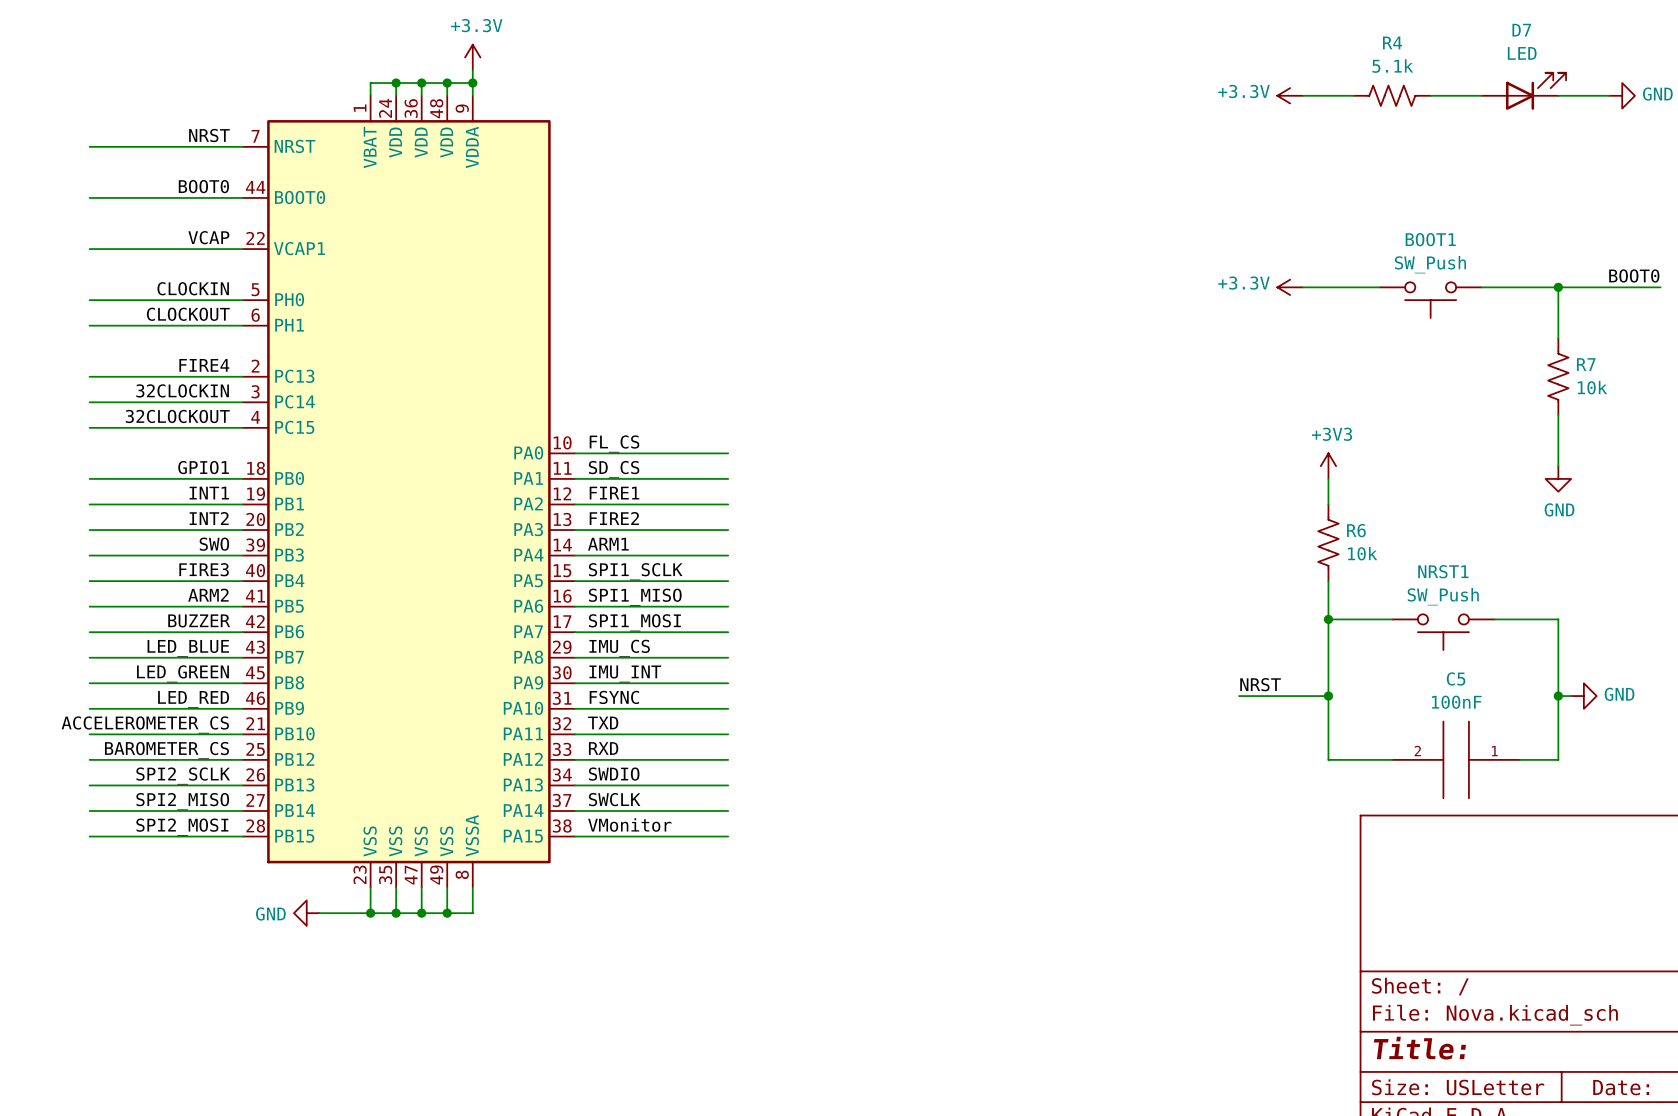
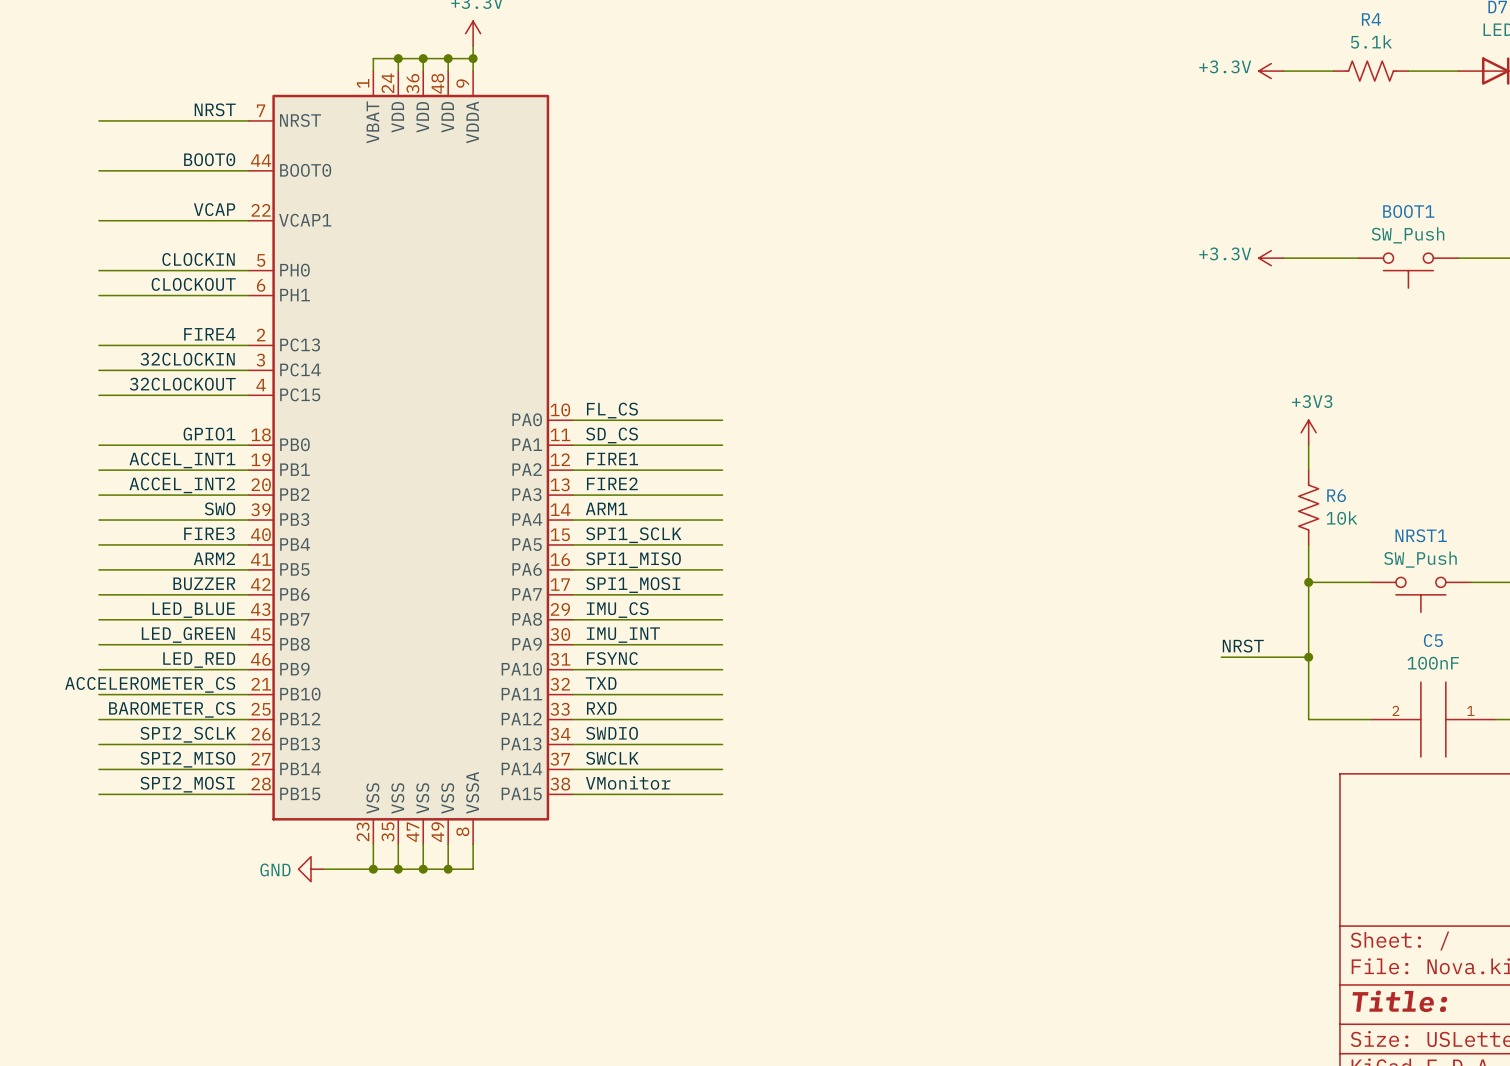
label: INT1 (209, 493) -> ACCEL_INT1 (182, 460)
label: INT2 (209, 518) -> ACCEL_INT2 (182, 485)

